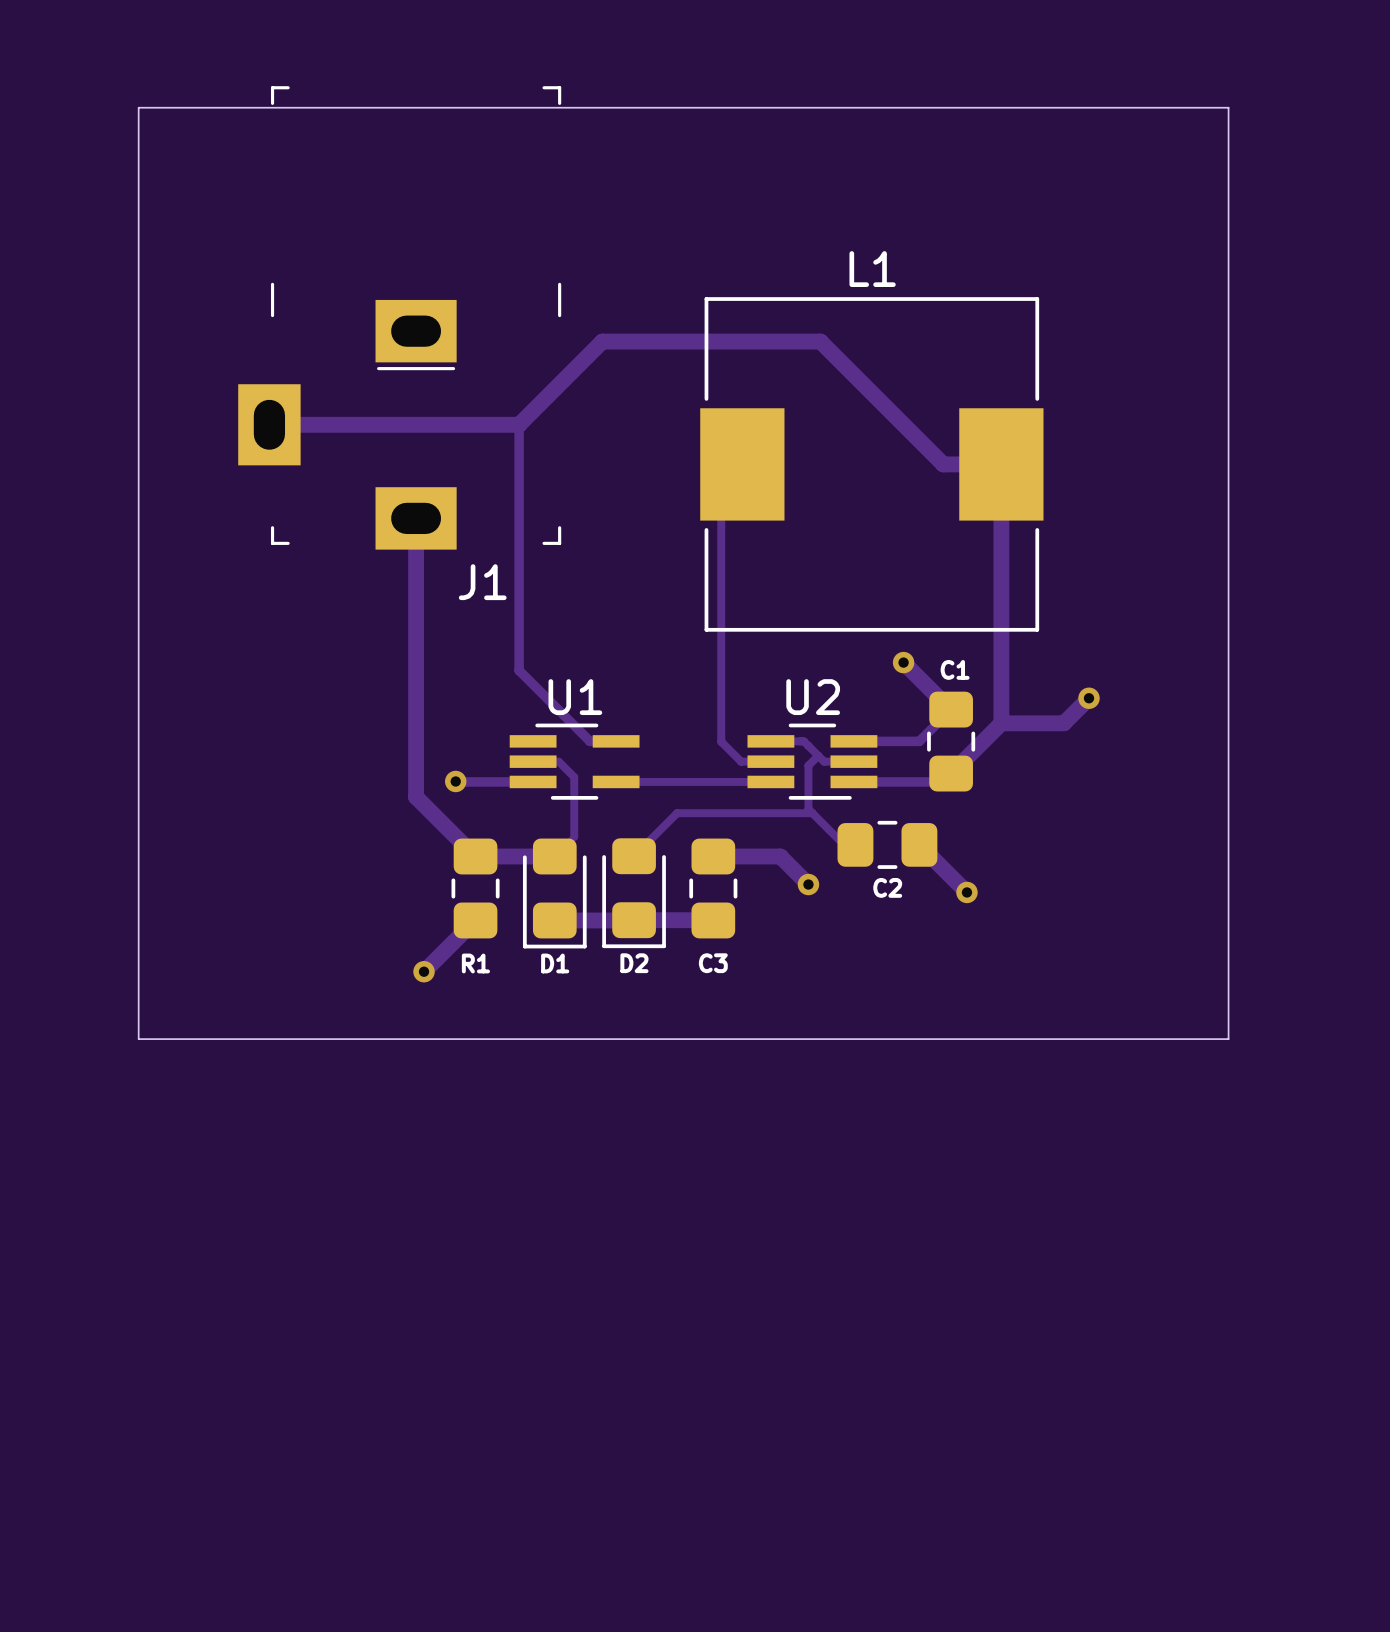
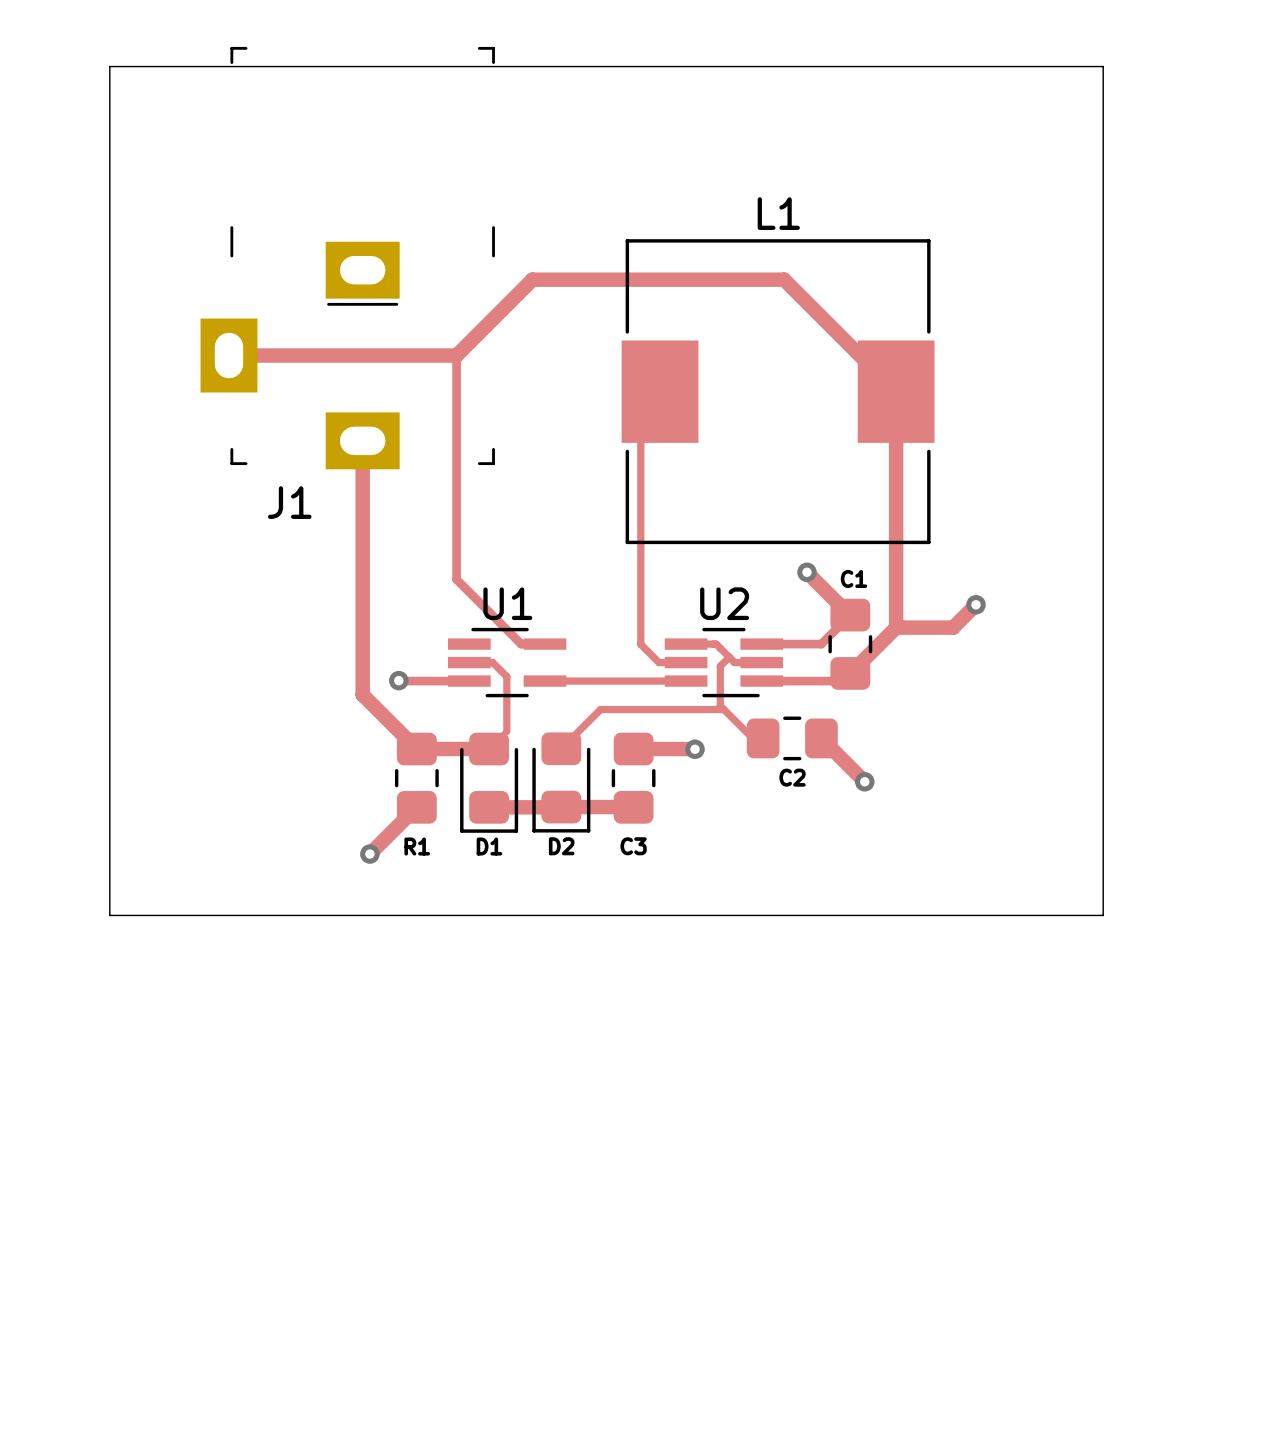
track: (820, 341) (943, 464) (1001, 464) -> (731, 279) (784, 279) (896, 391)
J1 name position: J1 (482, 582) -> J1 (289, 502)
track: (780, 856) (808, 884) -> none
via position: (808, 884) -> (695, 749)

